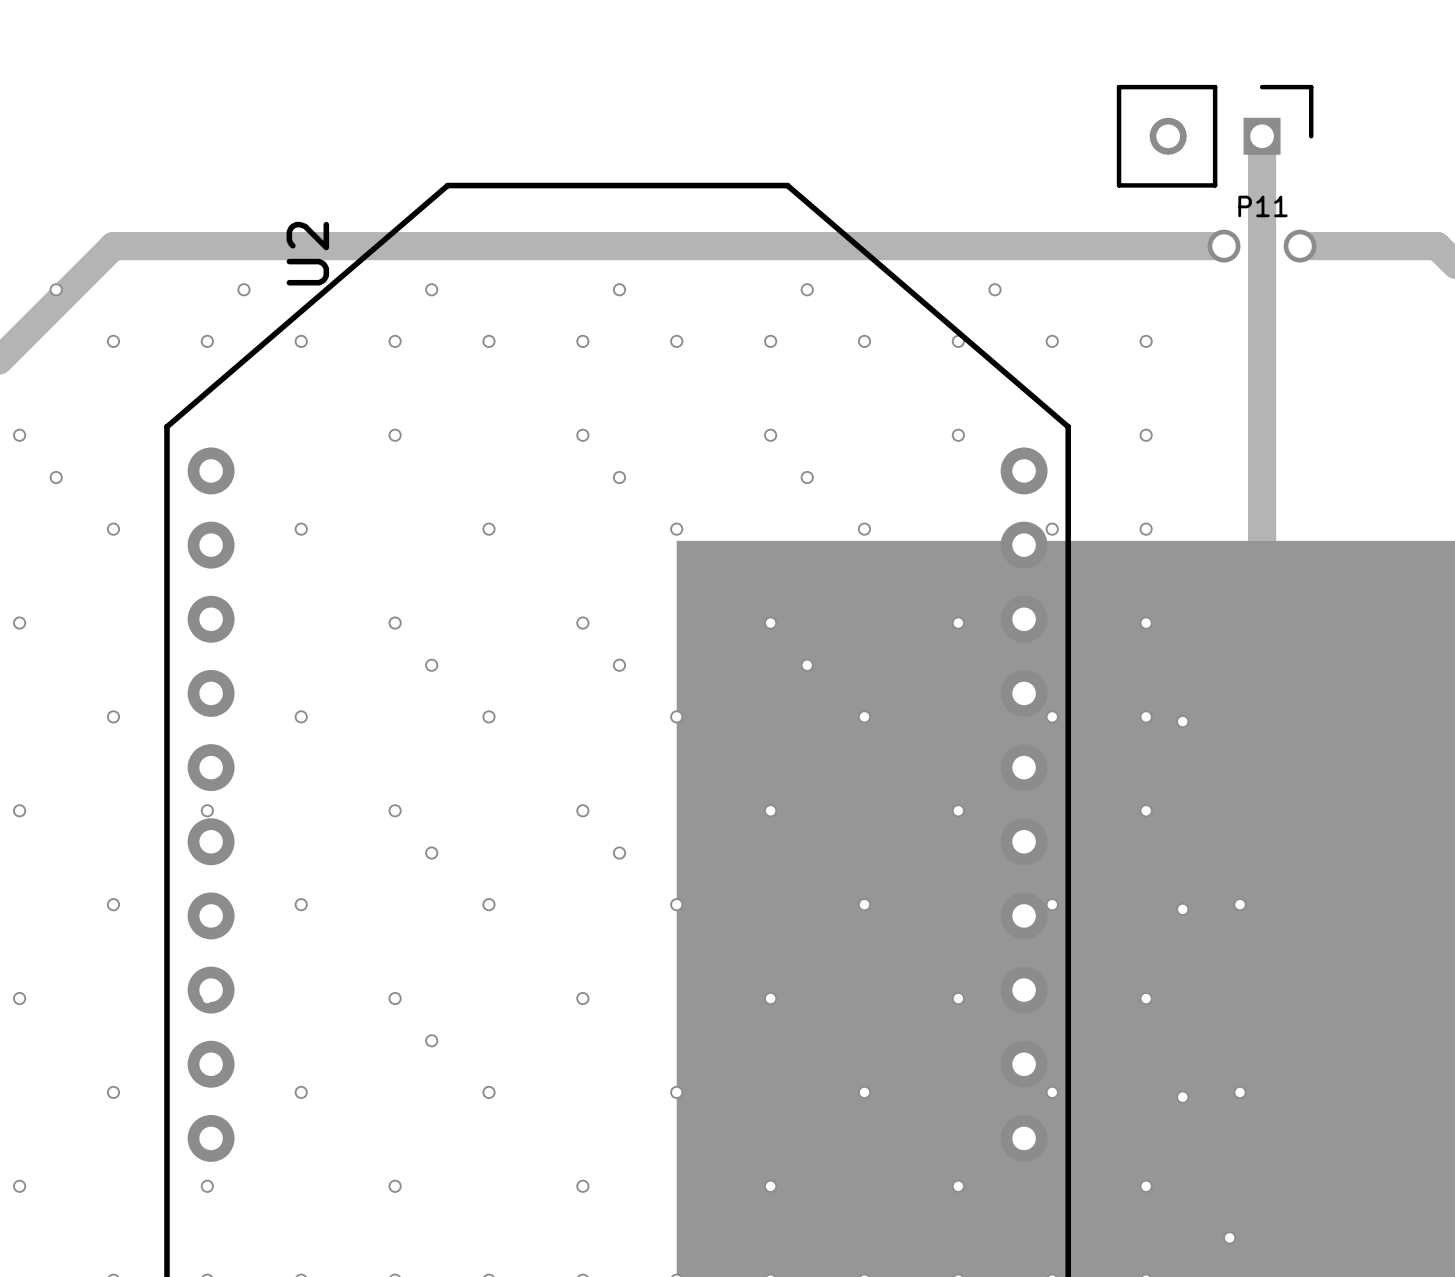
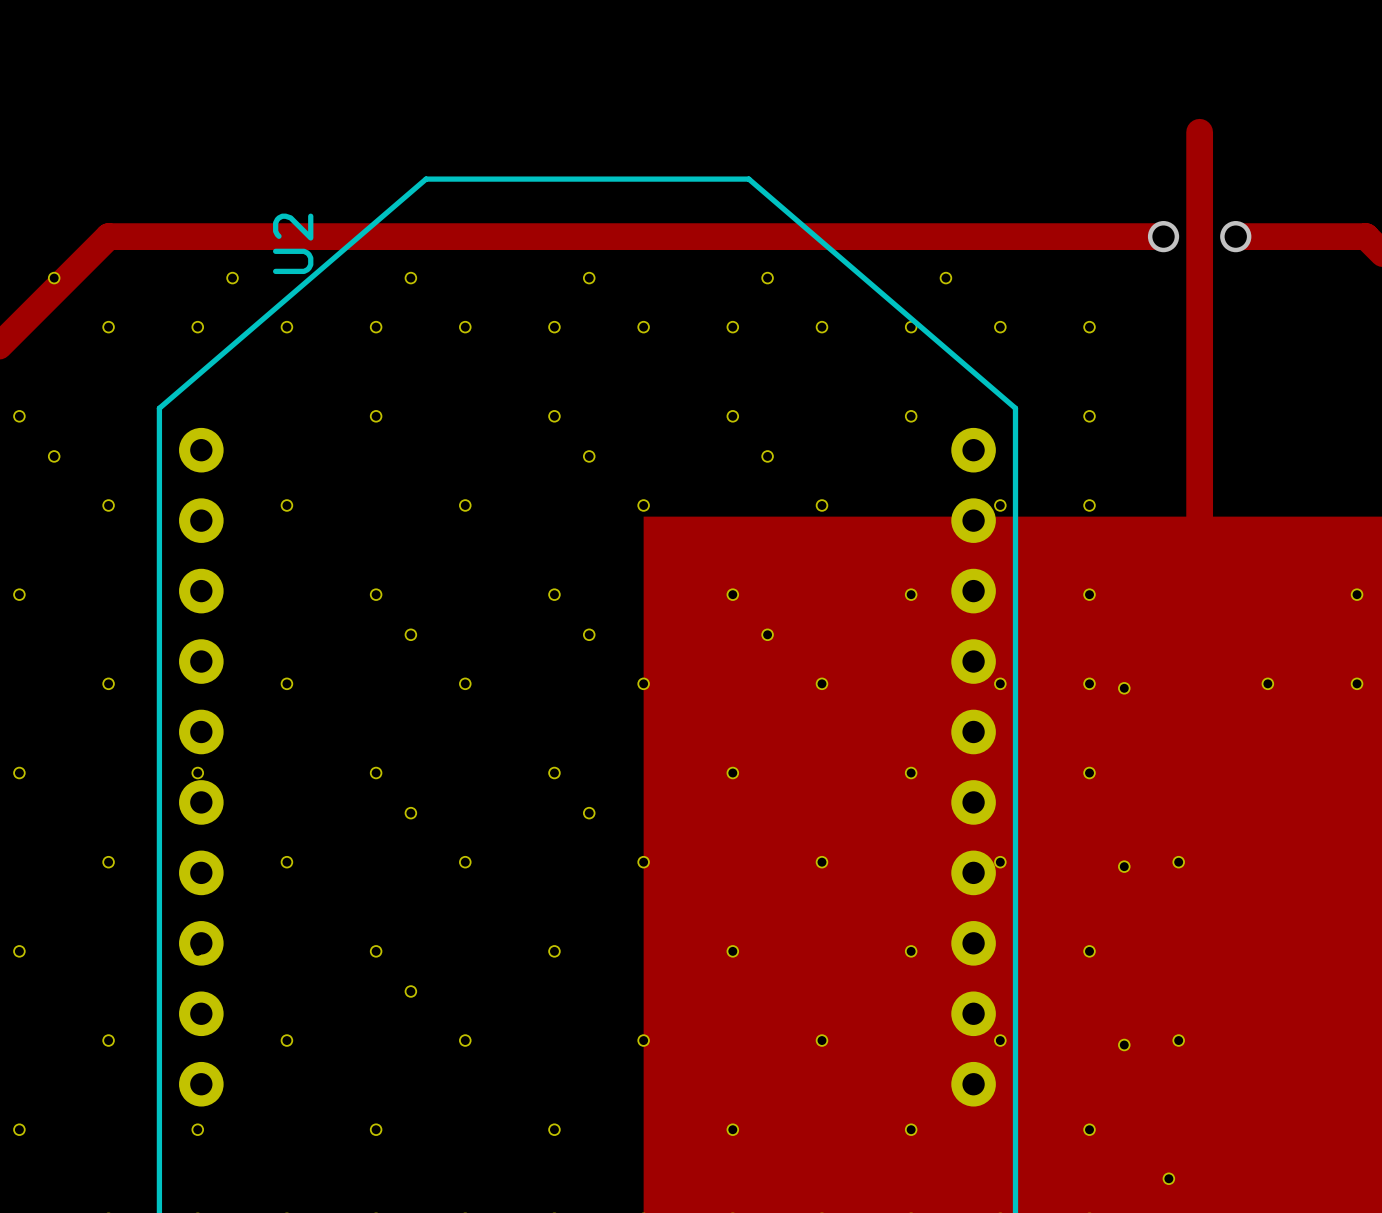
P11: (1215, 136) -> none
part: none -> (1357, 594)
part: none -> (1267, 683)
part: none -> (1357, 683)

